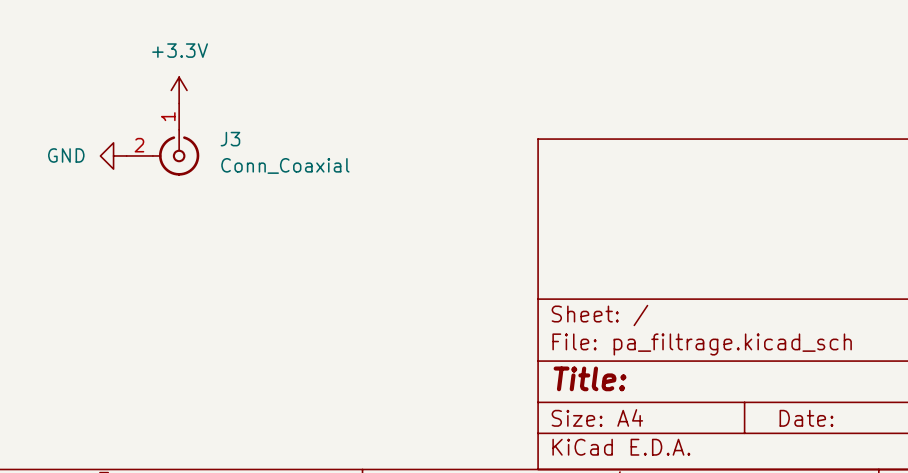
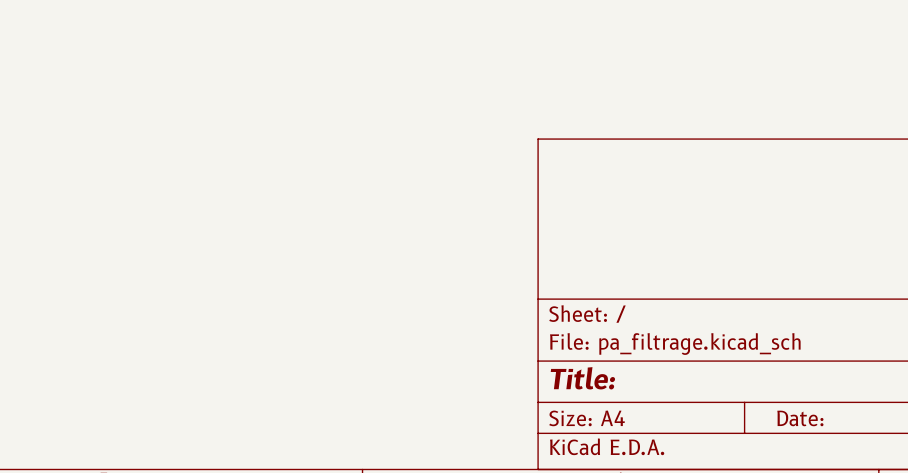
power symbol: +3.3V (179, 90) -> none
J3: Conn_Coaxial (162, 139) -> none
power symbol: GND (113, 155) -> none

